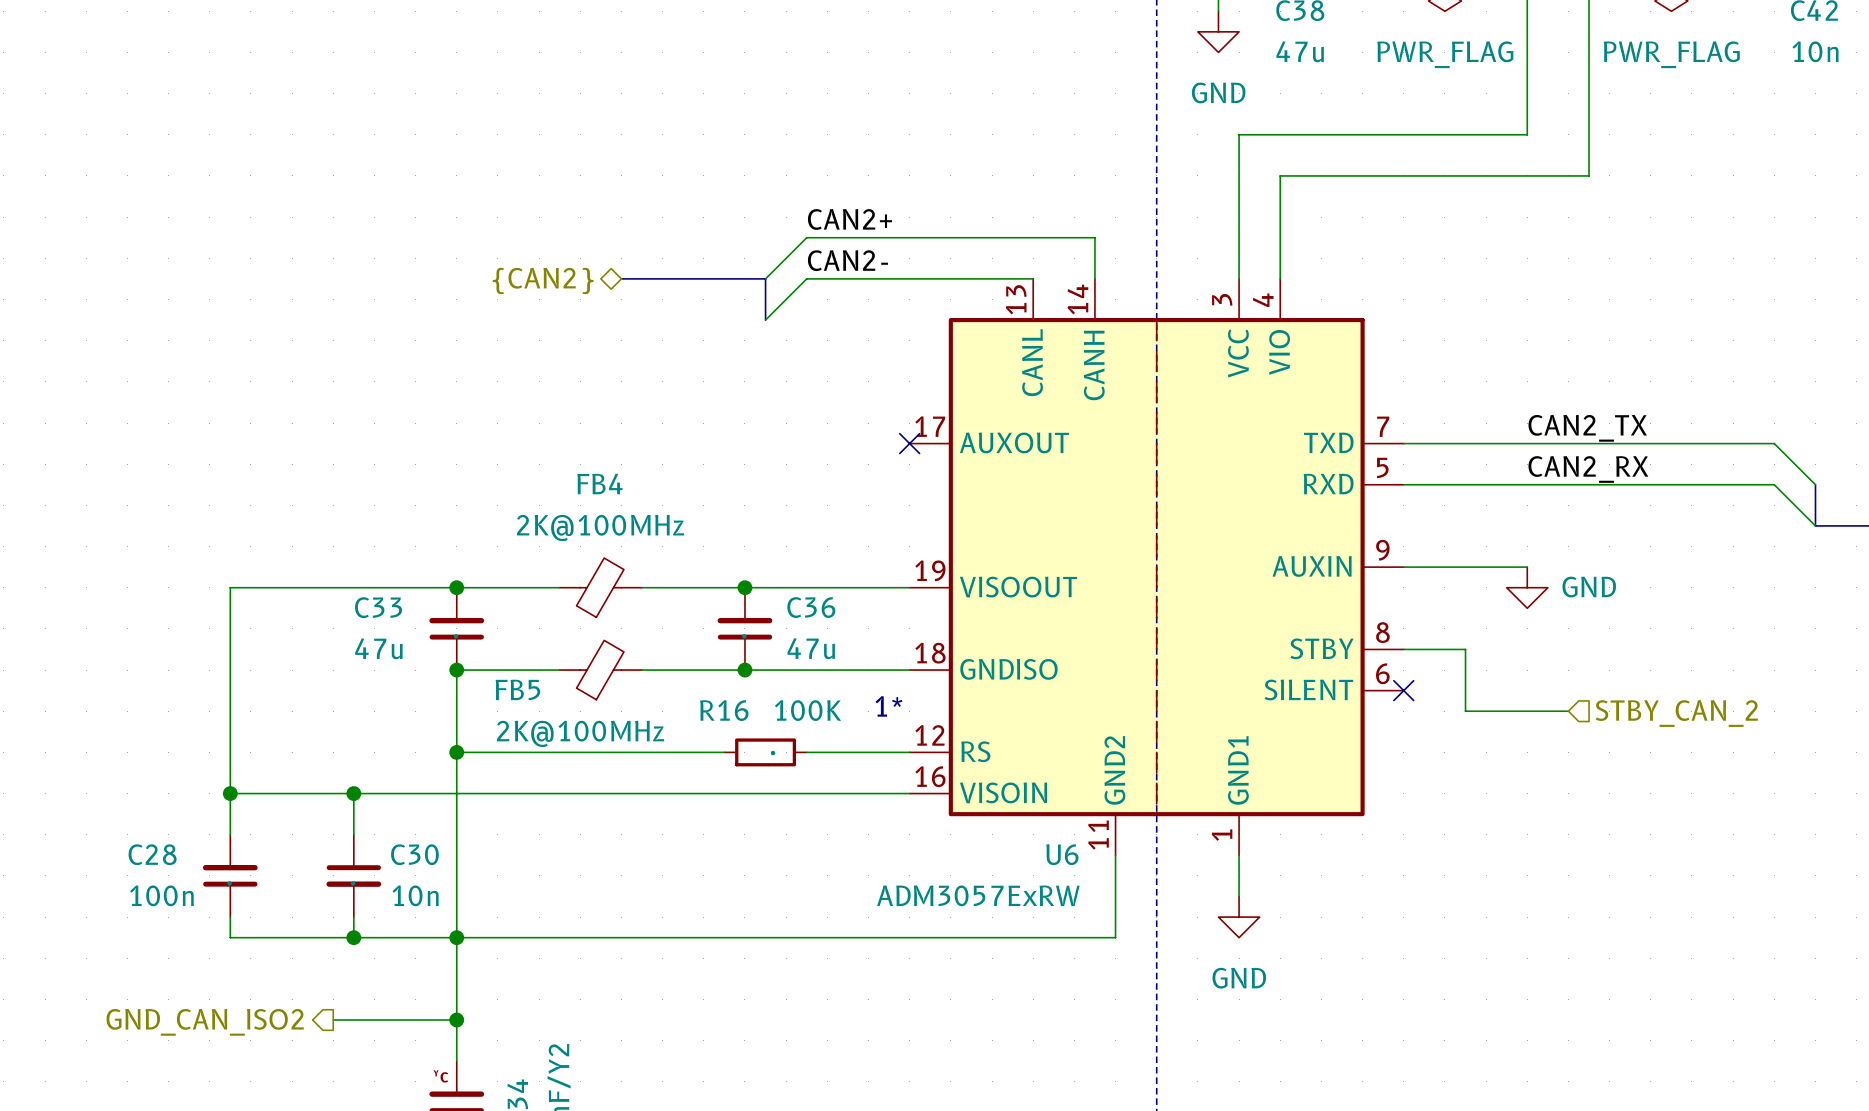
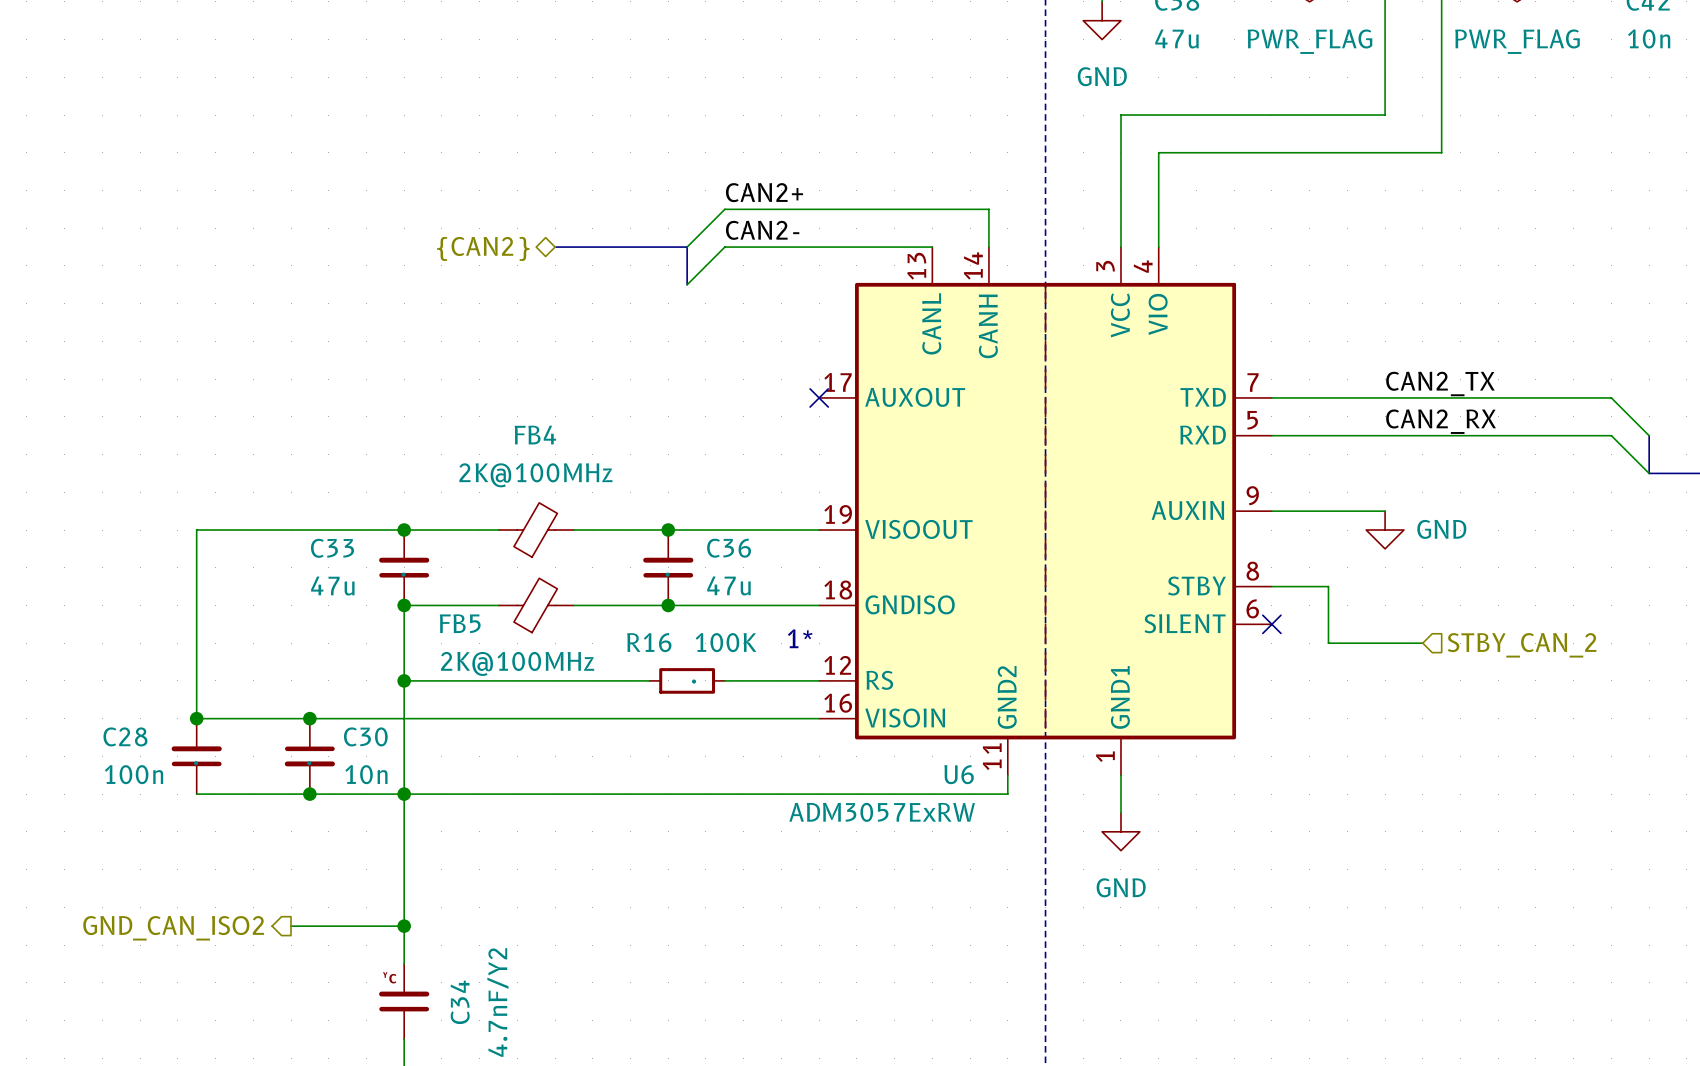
C28 position: (230, 875) -> (196, 756)
junction: none -> (309, 794)
C30 position: (353, 875) -> (309, 756)
junction: none -> (404, 794)
wire: (1115, 875) (1115, 937) (230, 937) (230, 917) -> (1007, 794) (196, 794)
wire: (353, 917) (353, 937) -> none
junction: (353, 937) -> none
junction: (456, 937) -> none

